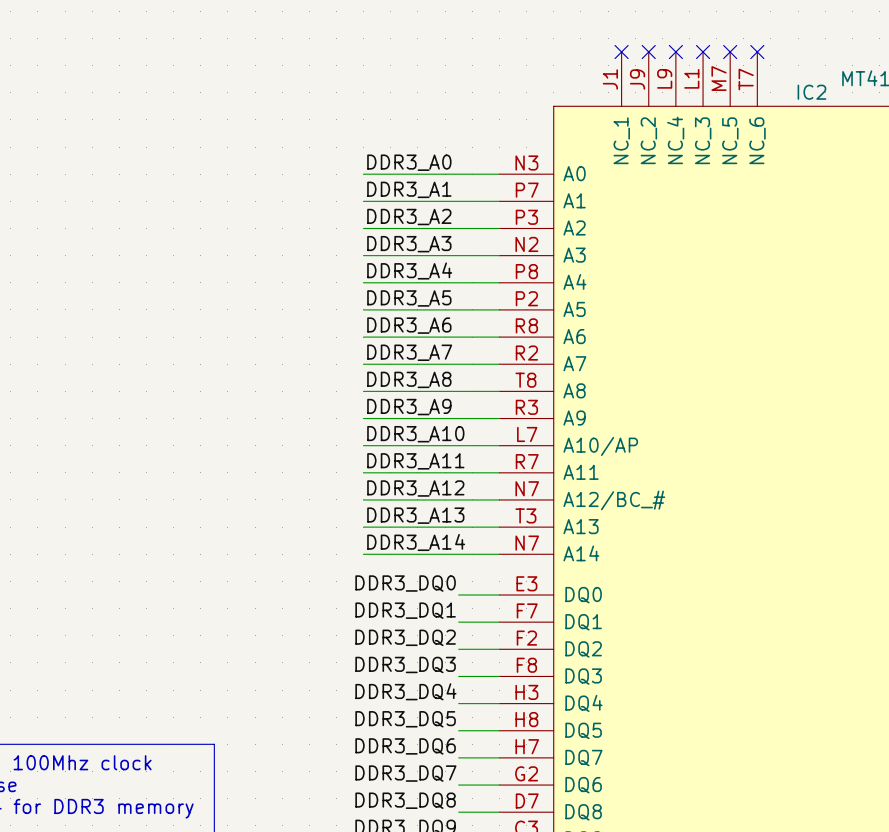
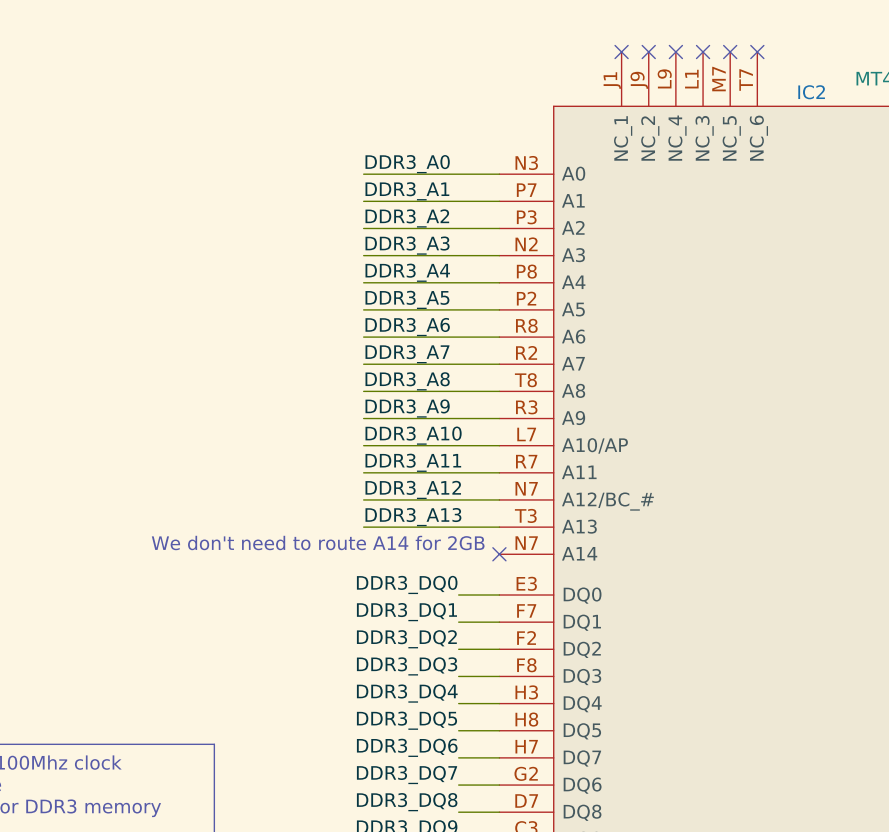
text: none -> We don't need to route A14 for 2GB (318, 543)
label: DDR3_A14 (416, 542) -> none
wire: (363, 554) (499, 554) -> none
no-connect mark: none -> (499, 554)

